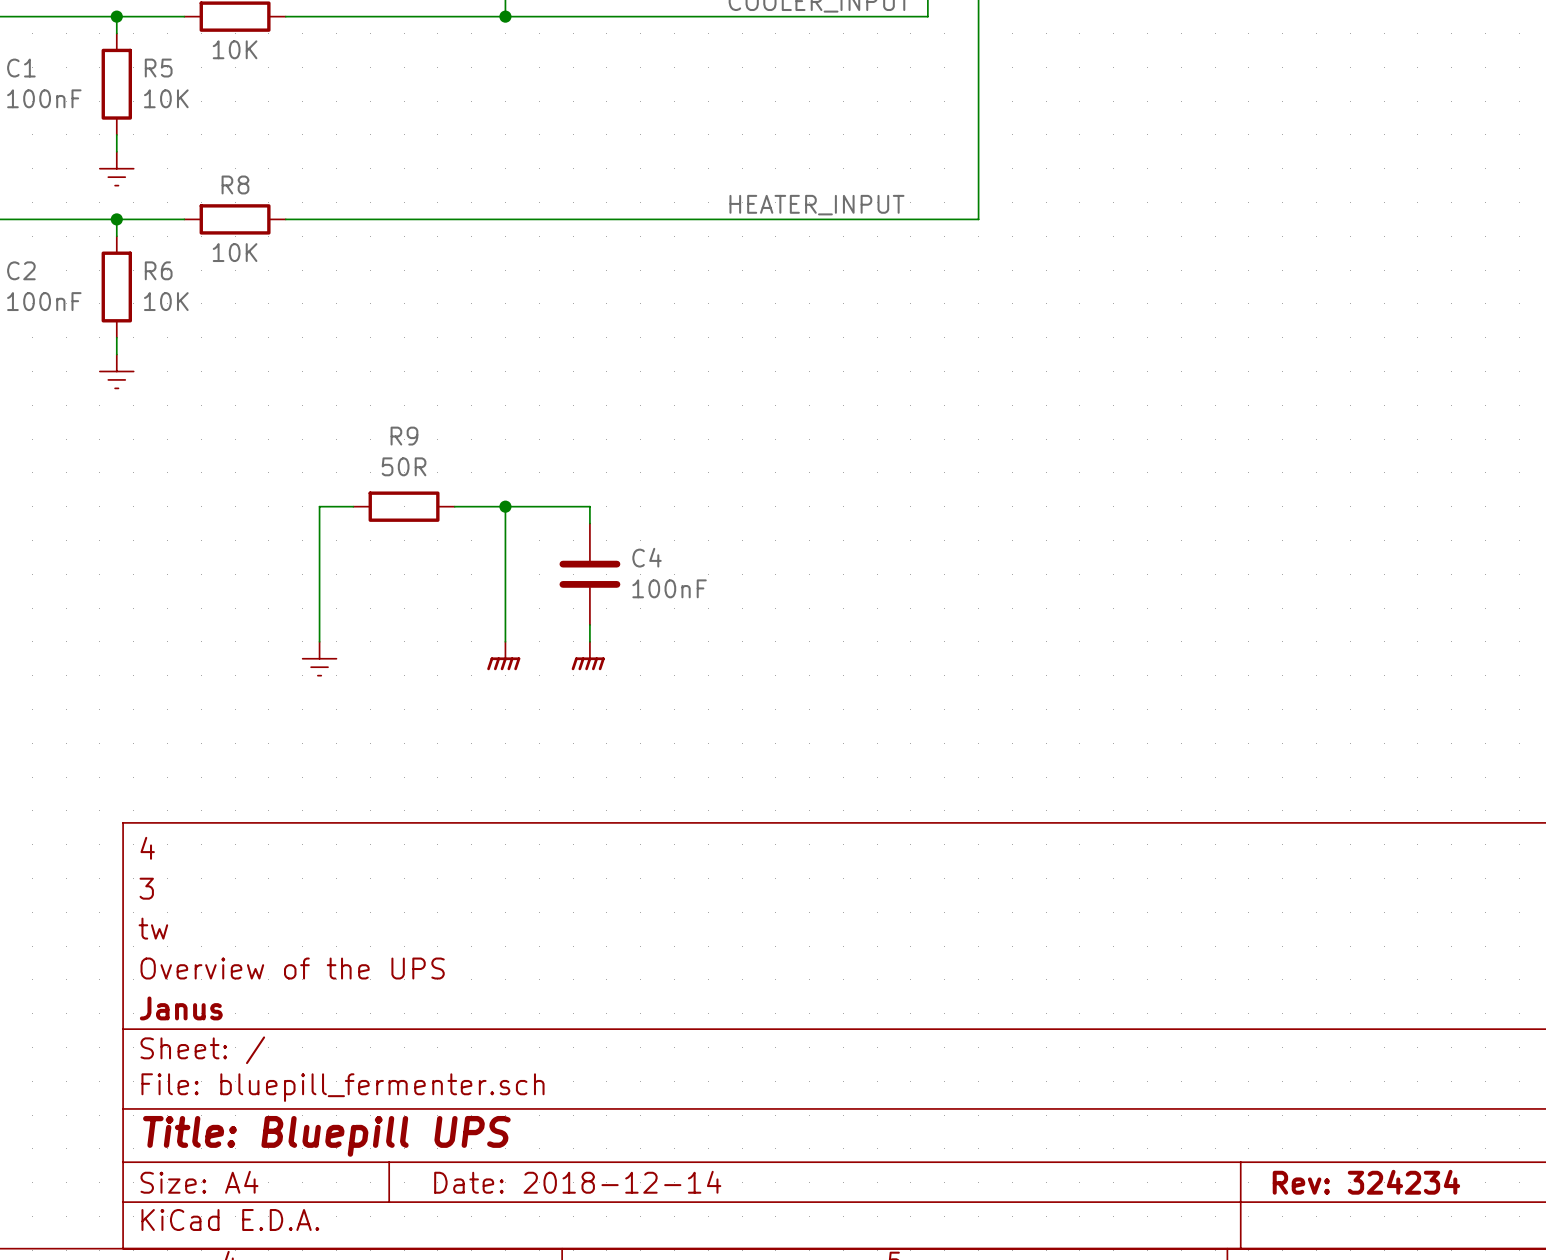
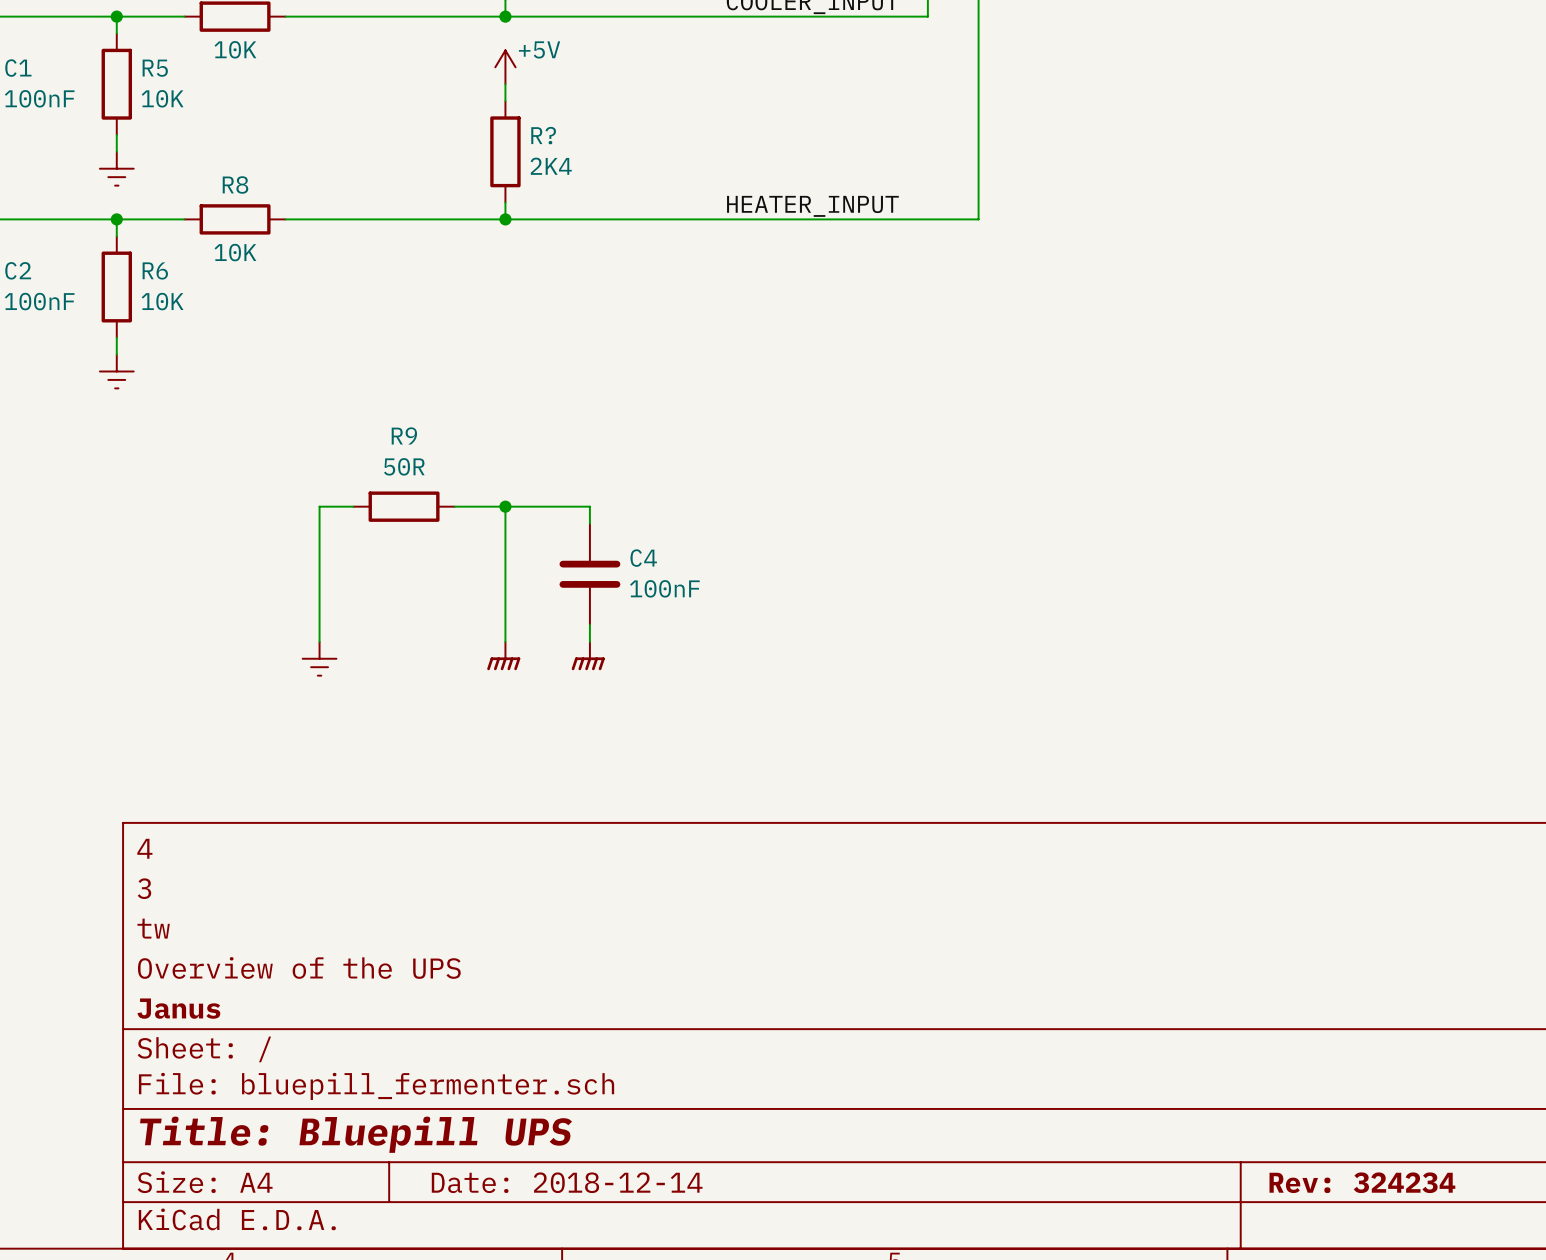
power symbol: none -> +5V (505, 67)
wire: none -> (505, 84) (505, 101)
R?: none -> 2K4 (505, 151)
wire: none -> (505, 202) (505, 219)
junction: none -> (505, 219)

